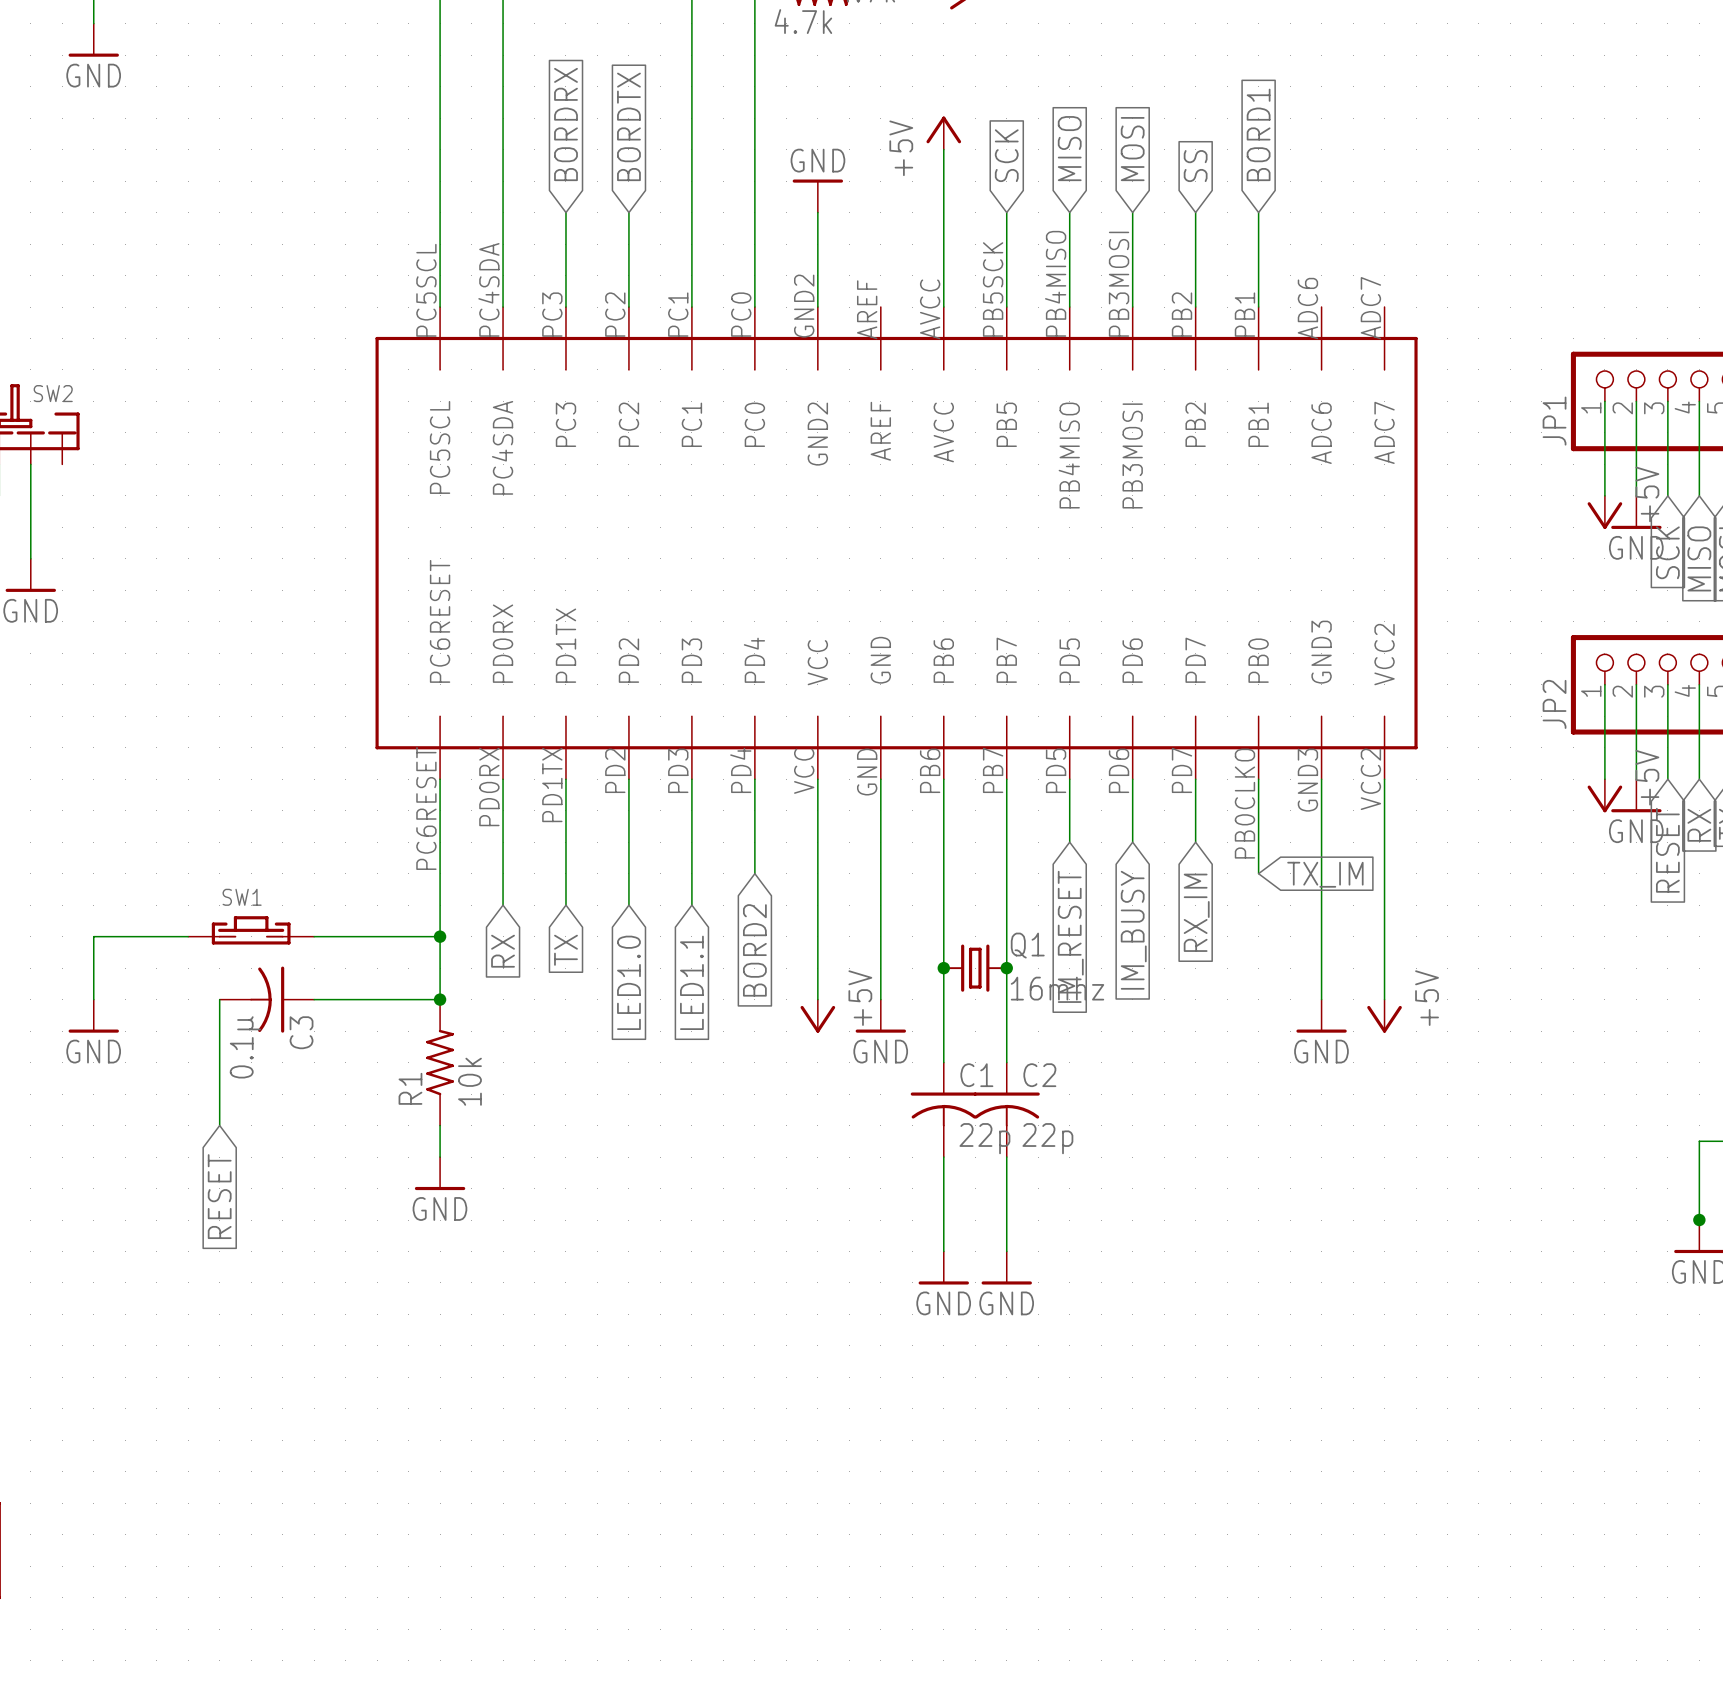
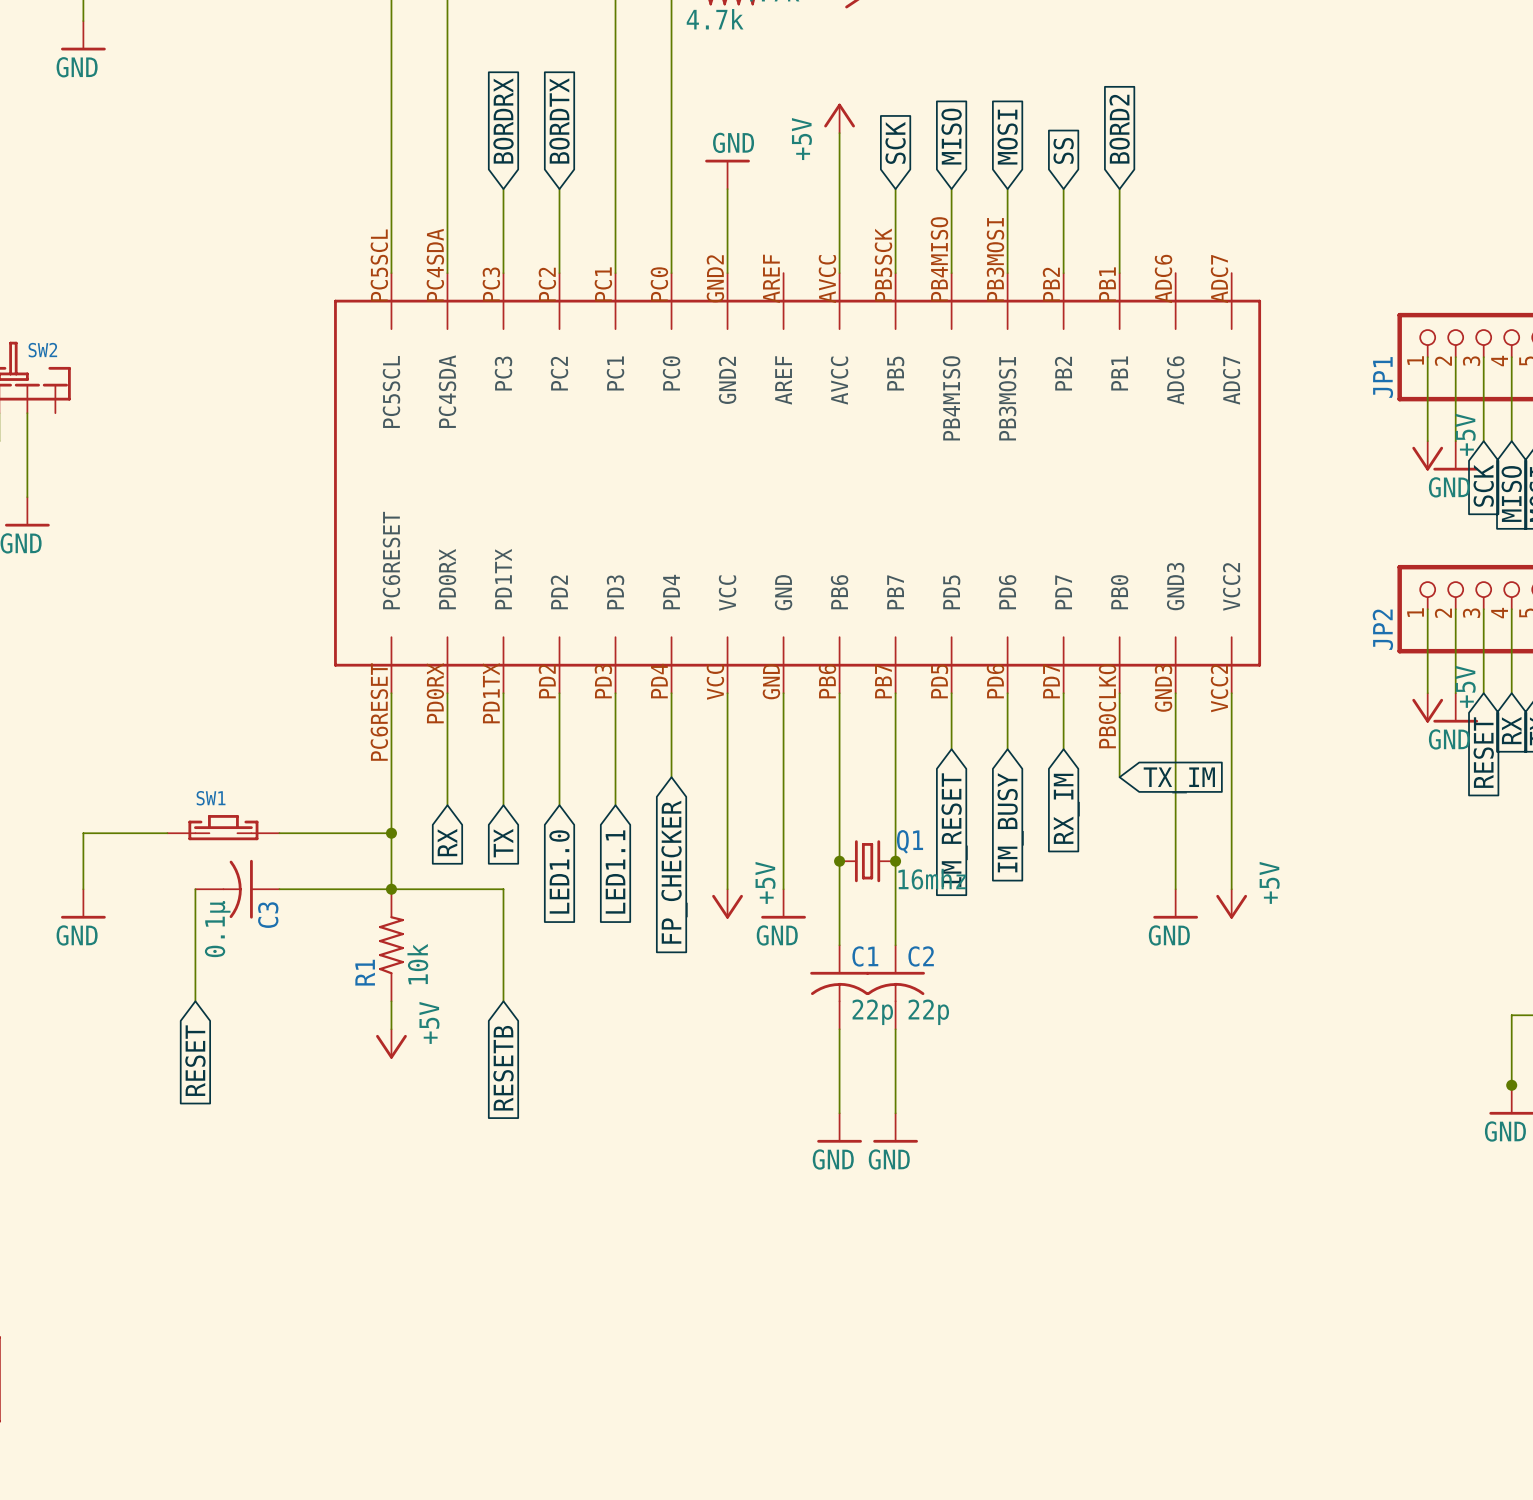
global label: BORD1 (1258, 134) -> BORD2 (1119, 129)
global label: BORD2 (754, 950) -> FP_CHECKER (674, 872)
wire: none -> (391, 889) (503, 889) (503, 1001)
power symbol: GND (440, 1173) -> +5V (391, 1043)
global label: none -> RESETB (503, 1068)

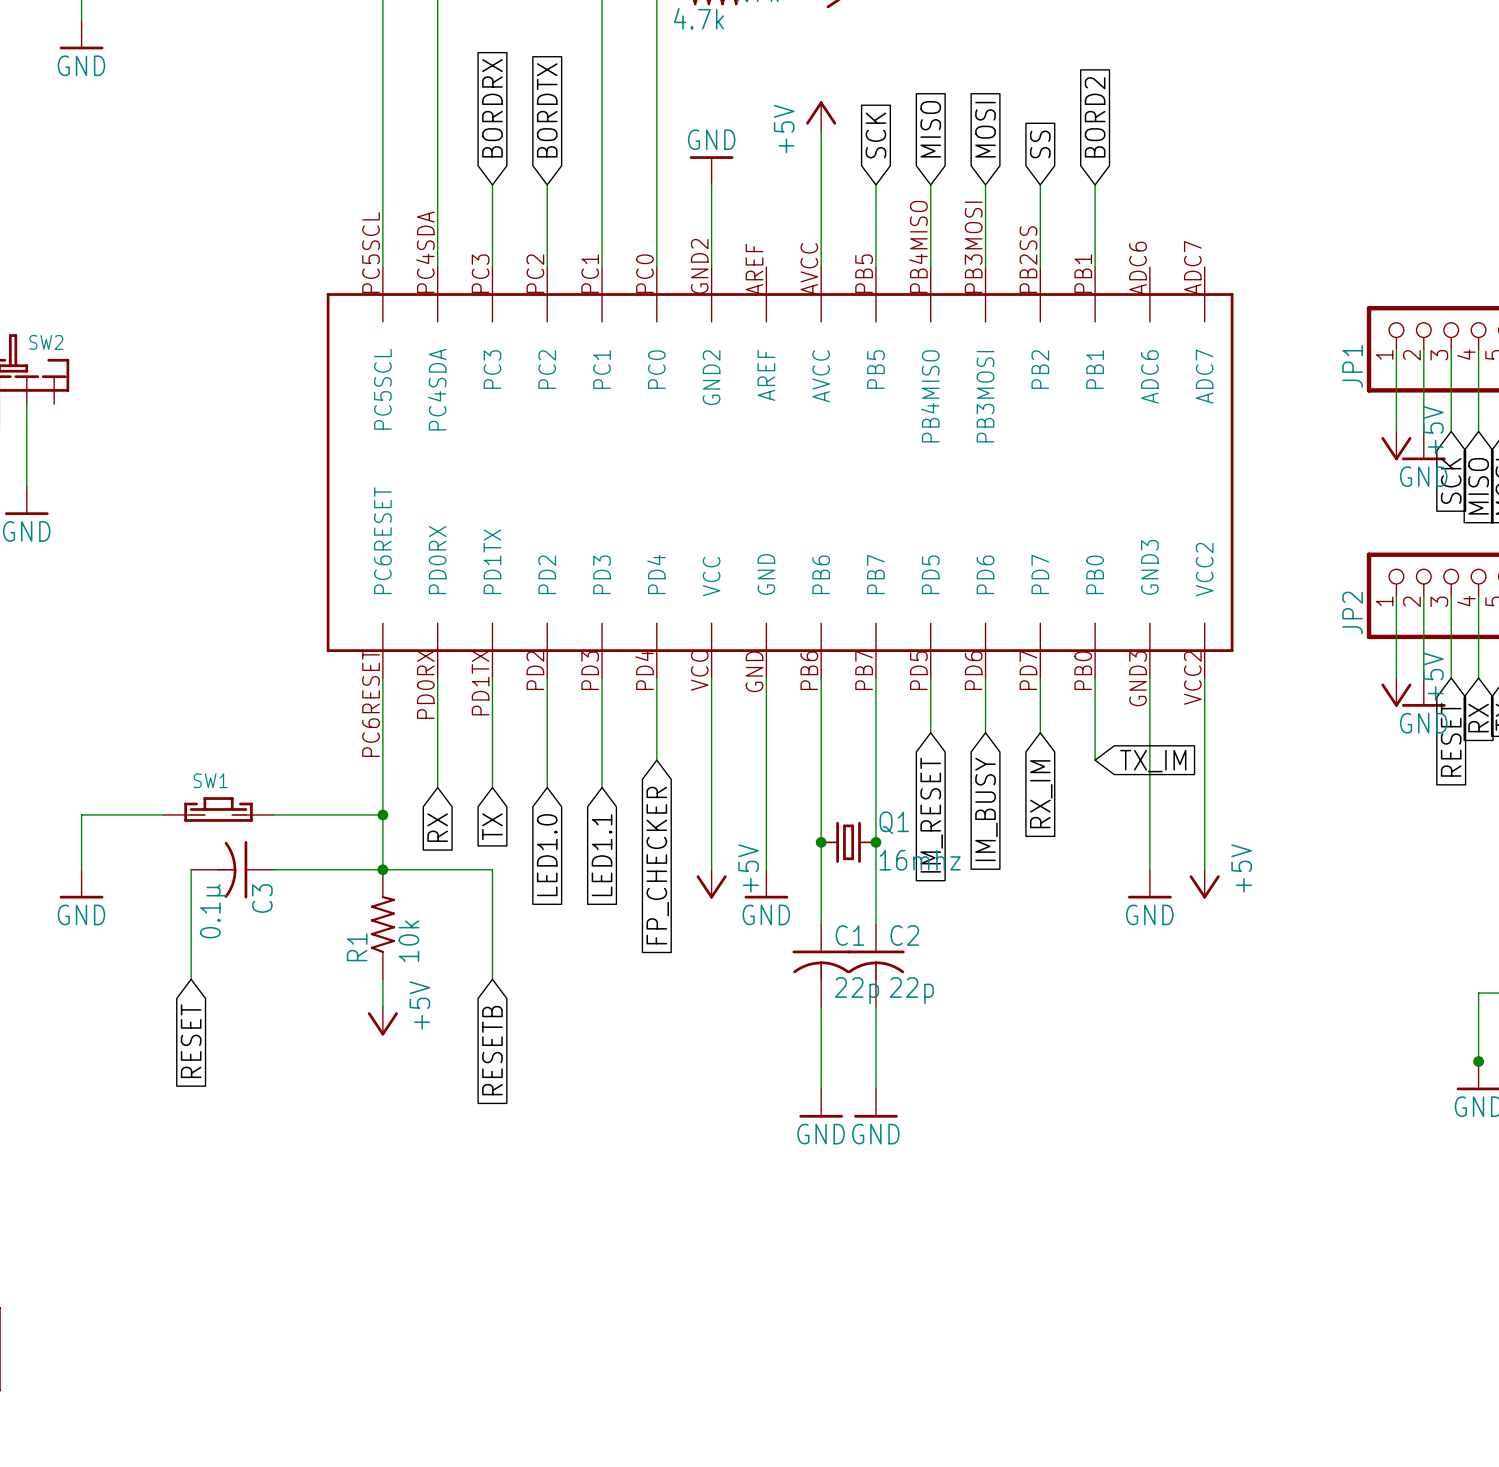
part pin number: PB5SCK (883, 265) -> PB5 (864, 273)
part pin number: PB2 (1051, 284) -> PB2SS (1028, 259)
part pin number: PB0CLKO (1107, 706) -> PB0 (1083, 670)

